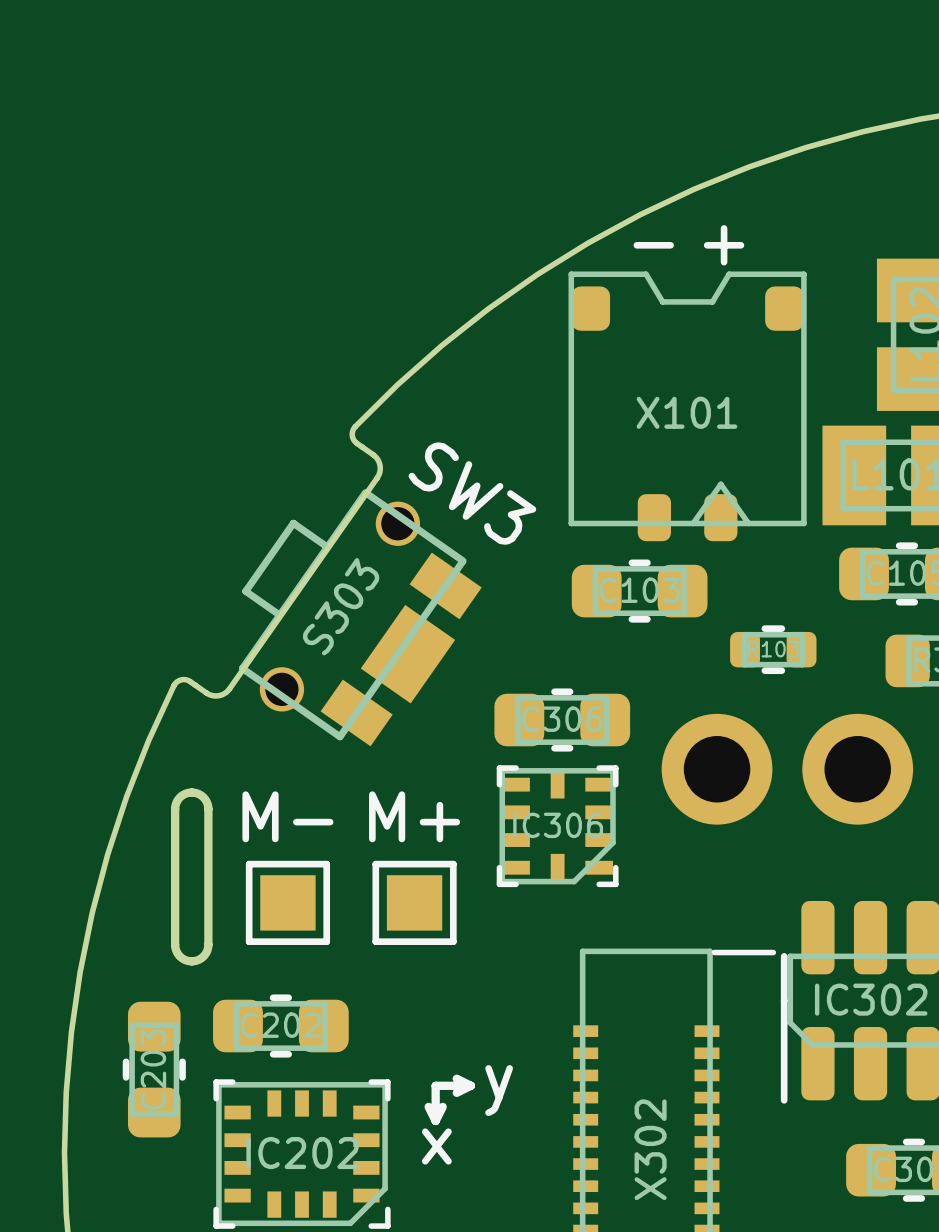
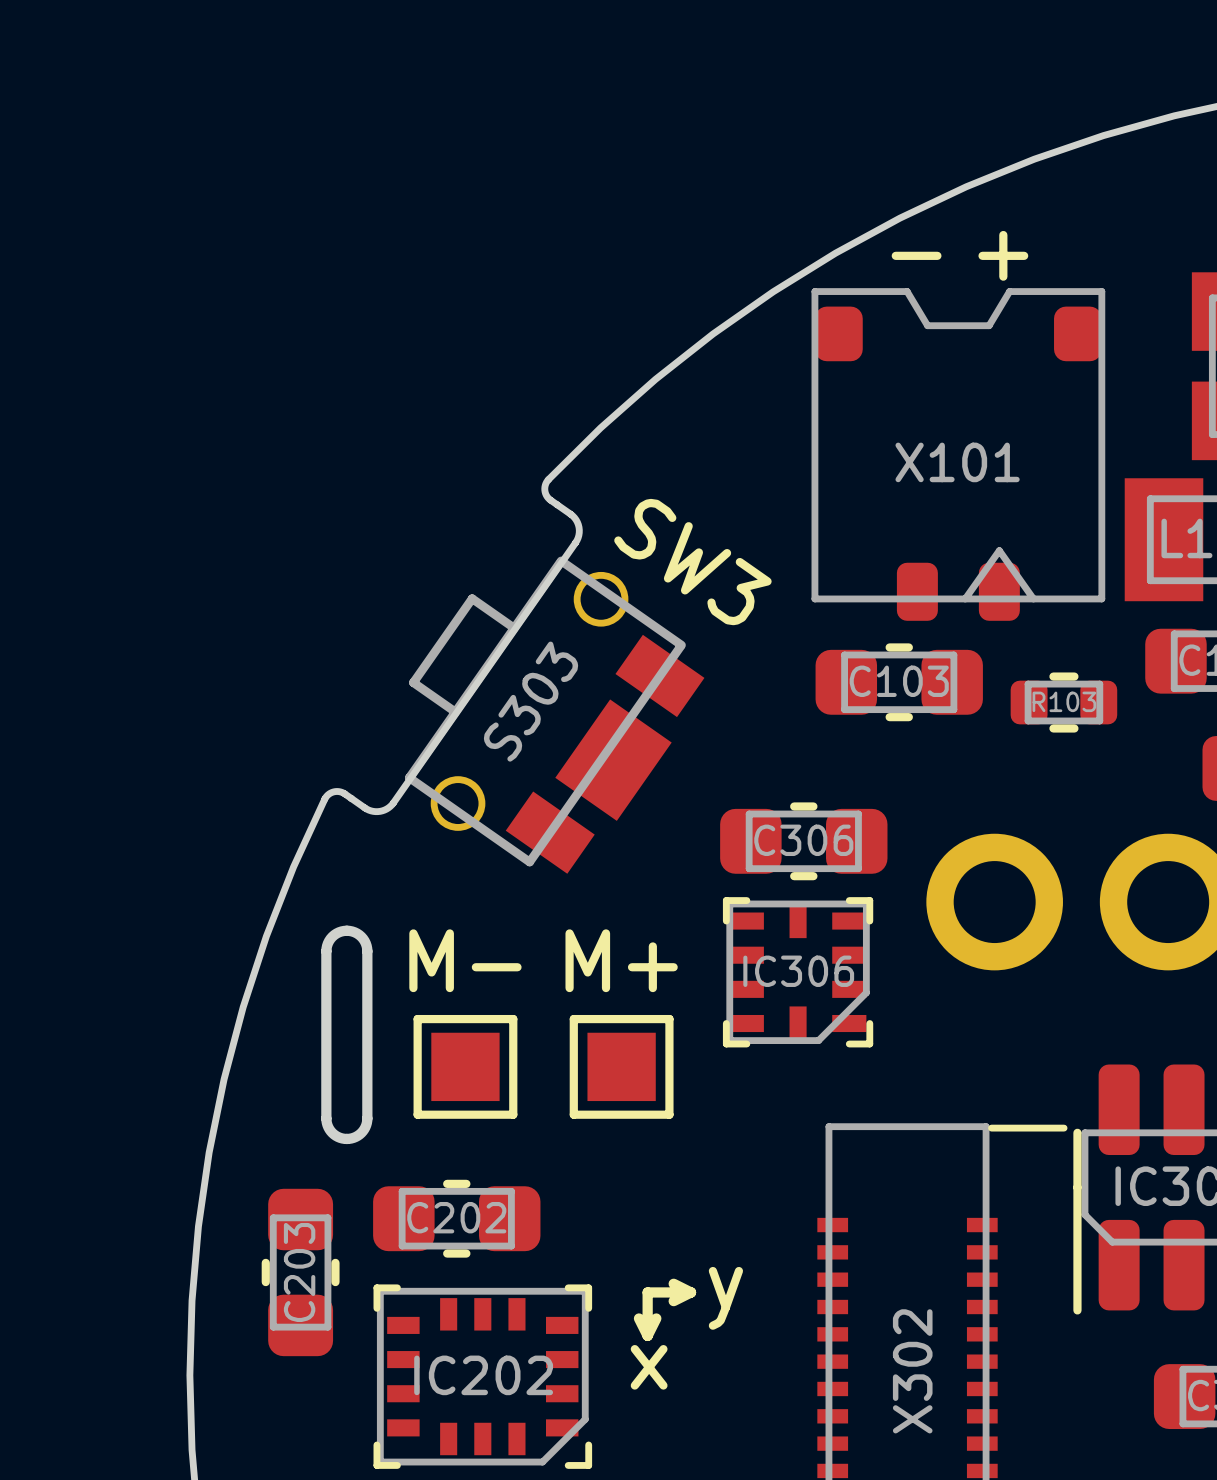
R103 position: (773, 649) -> (1063, 702)

